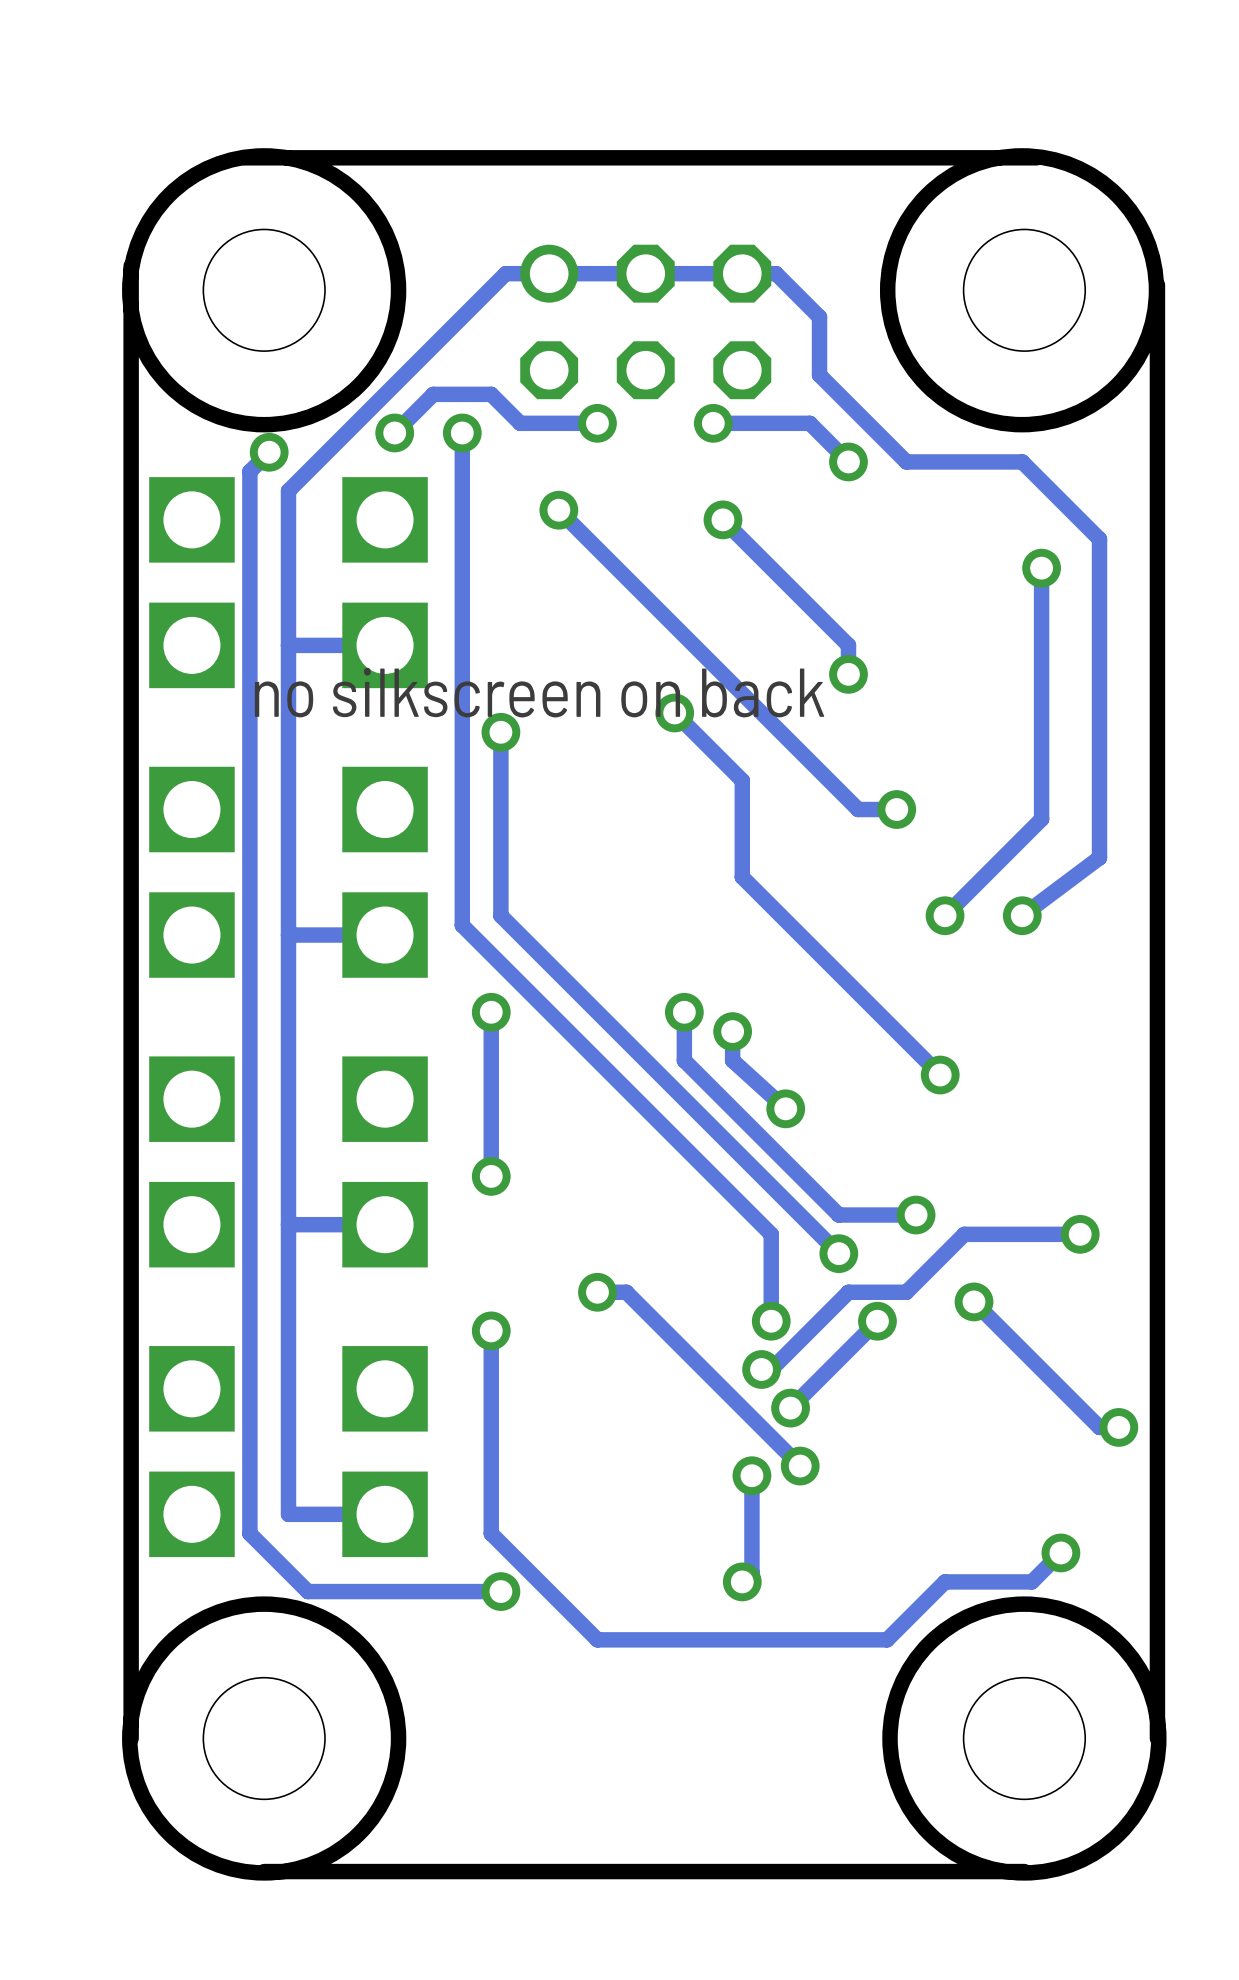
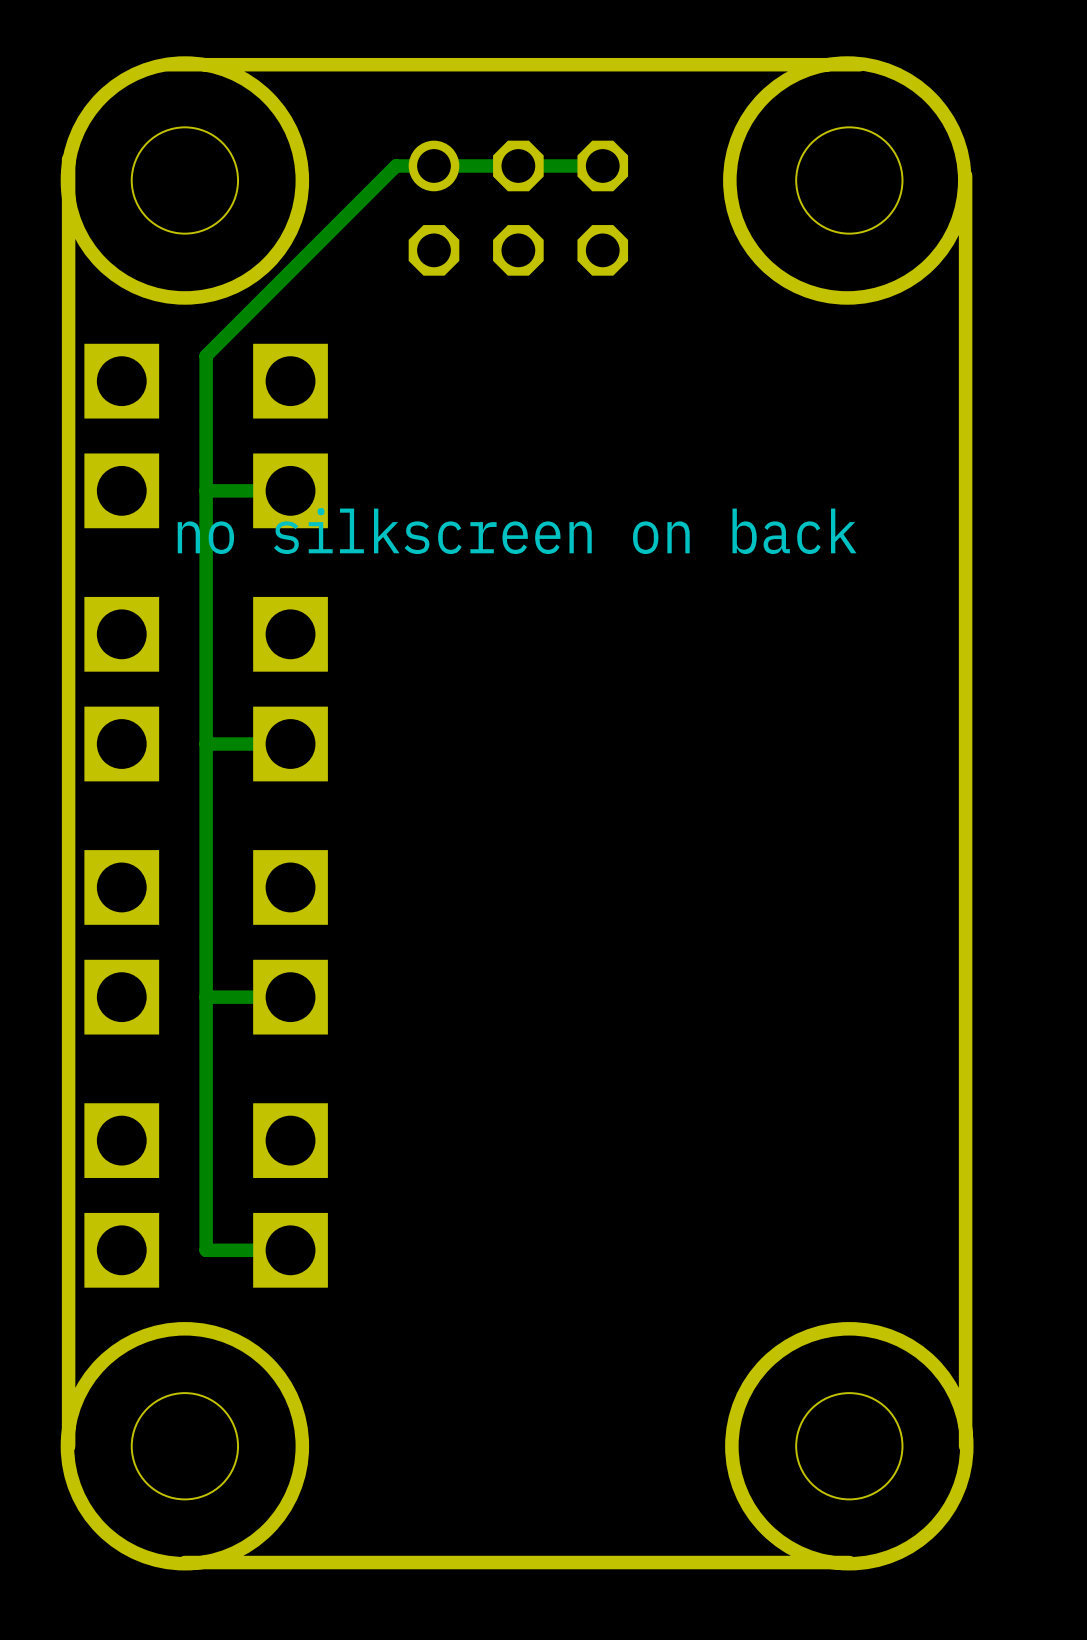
track: (742, 273) (776, 273) (819, 317) (819, 375) (906, 461) (1022, 461) (1099, 539) (1099, 857) (1022, 915) -> none
track: (597, 423) (520, 423) (491, 394) (433, 394) (394, 432) -> none
via: (597, 423) -> none
track: (713, 423) (809, 423) (848, 461) -> none
via: (713, 423) -> none
via: (394, 432) -> none
track: (462, 432) (462, 925) (771, 1234) (771, 1321) -> none
via: (462, 432) -> none
track: (269, 452) (249, 471) (249, 1533) (307, 1591) (500, 1591) -> none
via: (269, 452) -> none
via: (848, 461) -> none
track: (558, 510) (858, 809) (896, 809) -> none
via: (558, 510) -> none
track: (722, 519) (848, 645) (848, 674) -> none
via: (722, 519) -> none
track: (1041, 568) (1041, 819) (945, 915) -> none
via: (1041, 568) -> none
via: (848, 674) -> none
track: (674, 712) (742, 780) (742, 877) (940, 1075) -> none
via: (674, 712) -> none
track: (500, 732) (500, 915) (838, 1253) -> none
via: (500, 732) -> none
via: (896, 809) -> none
via: (945, 915) -> none
via: (1022, 915) -> none
track: (491, 1012) (491, 1176) -> none
via: (491, 1012) -> none
track: (684, 1012) (684, 1060) (838, 1215) (916, 1215) -> none
via: (684, 1012) -> none
track: (732, 1031) (732, 1060) (785, 1108) -> none
via: (732, 1031) -> none
via: (940, 1075) -> none
via: (785, 1108) -> none
via: (491, 1176) -> none
via: (916, 1215) -> none
track: (1080, 1234) (964, 1234) (906, 1292) (848, 1292) (771, 1369) (761, 1369) -> none
via: (1080, 1234) -> none
via: (838, 1253) -> none
track: (597, 1292) (626, 1292) (800, 1466) -> none
via: (597, 1292) -> none
track: (974, 1301) (1099, 1427) (1118, 1427) -> none
via: (974, 1301) -> none
via: (771, 1321) -> none
track: (877, 1321) (790, 1408) -> none
via: (877, 1321) -> none
track: (491, 1330) (491, 1533) (597, 1639) (887, 1639) (945, 1581) (1031, 1581) (1060, 1552) -> none
via: (491, 1330) -> none
via: (761, 1369) -> none
via: (790, 1408) -> none
via: (1118, 1427) -> none
via: (800, 1466) -> none
track: (751, 1475) (751, 1572) (742, 1581) -> none
via: (751, 1475) -> none
via: (1060, 1552) -> none
via: (742, 1581) -> none
via: (500, 1591) -> none

